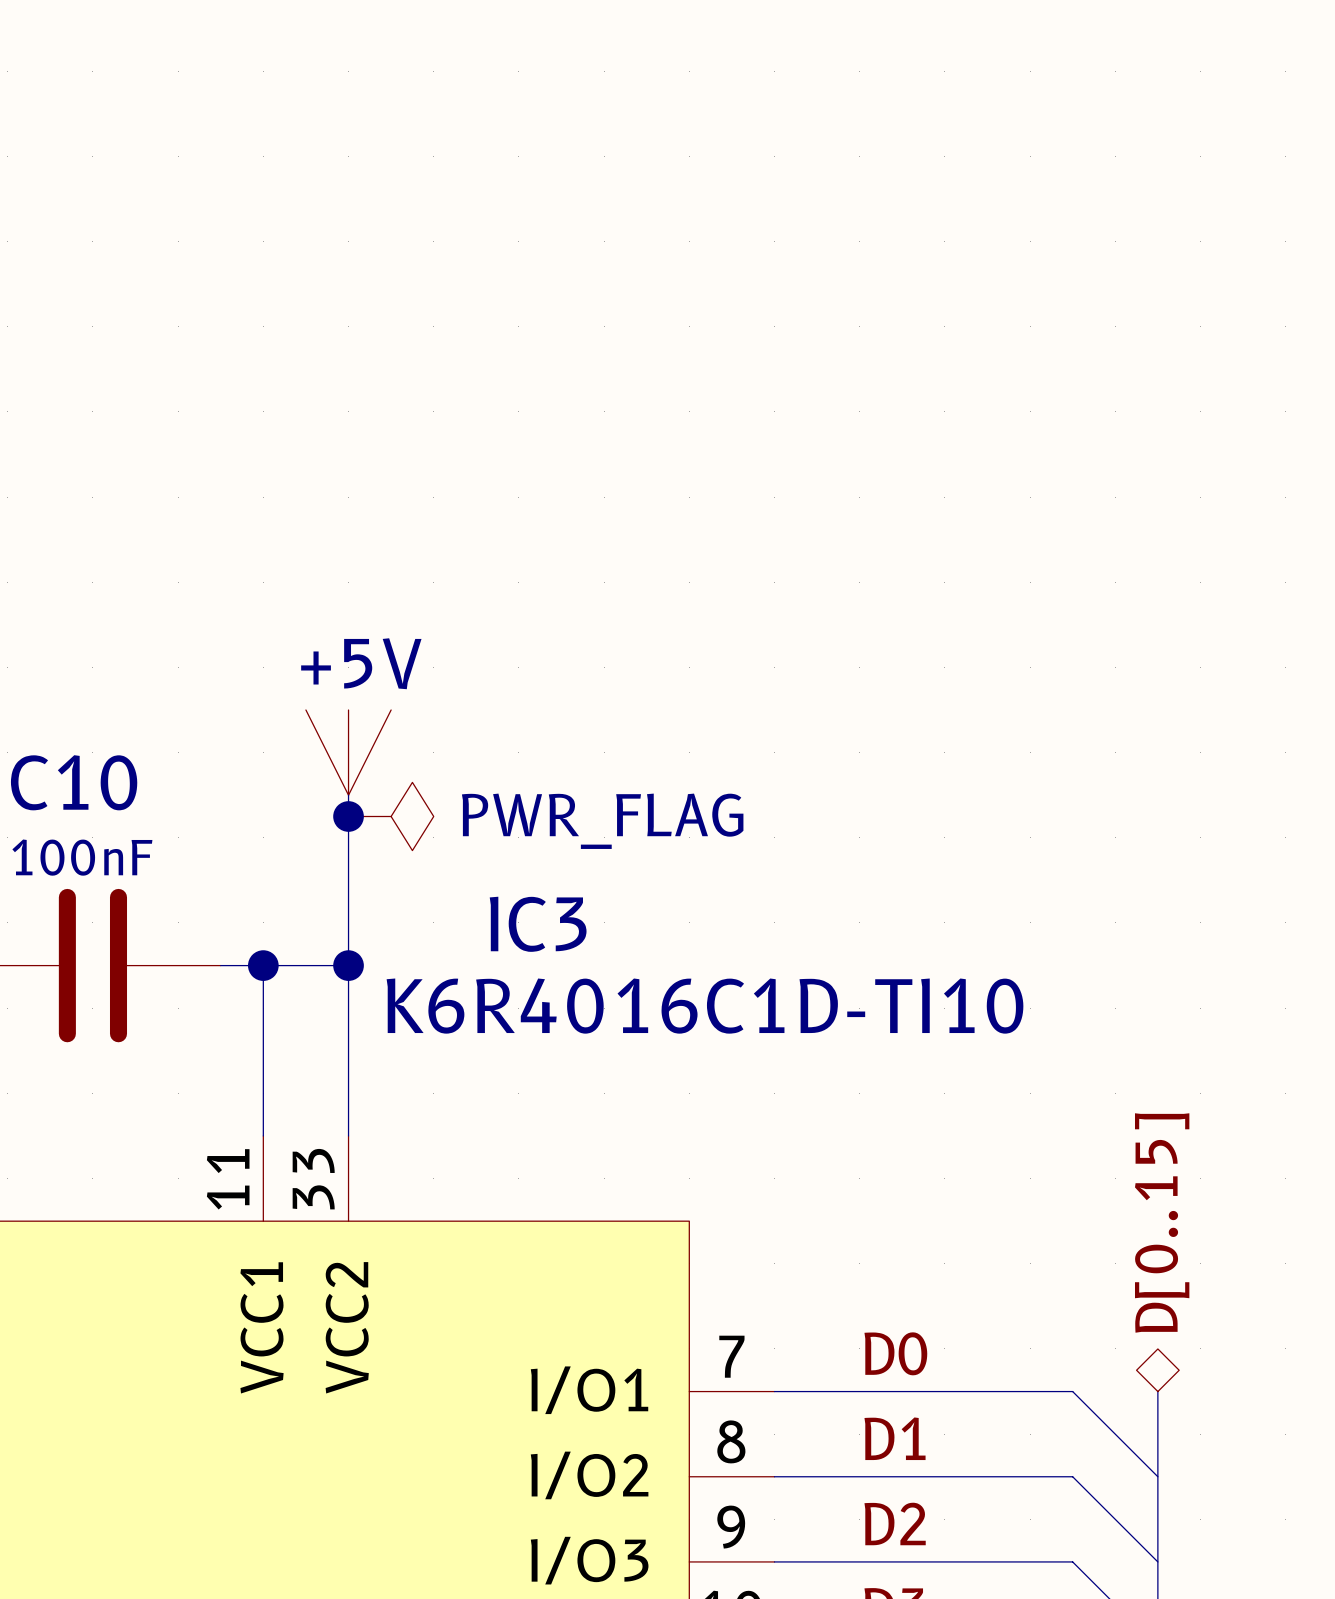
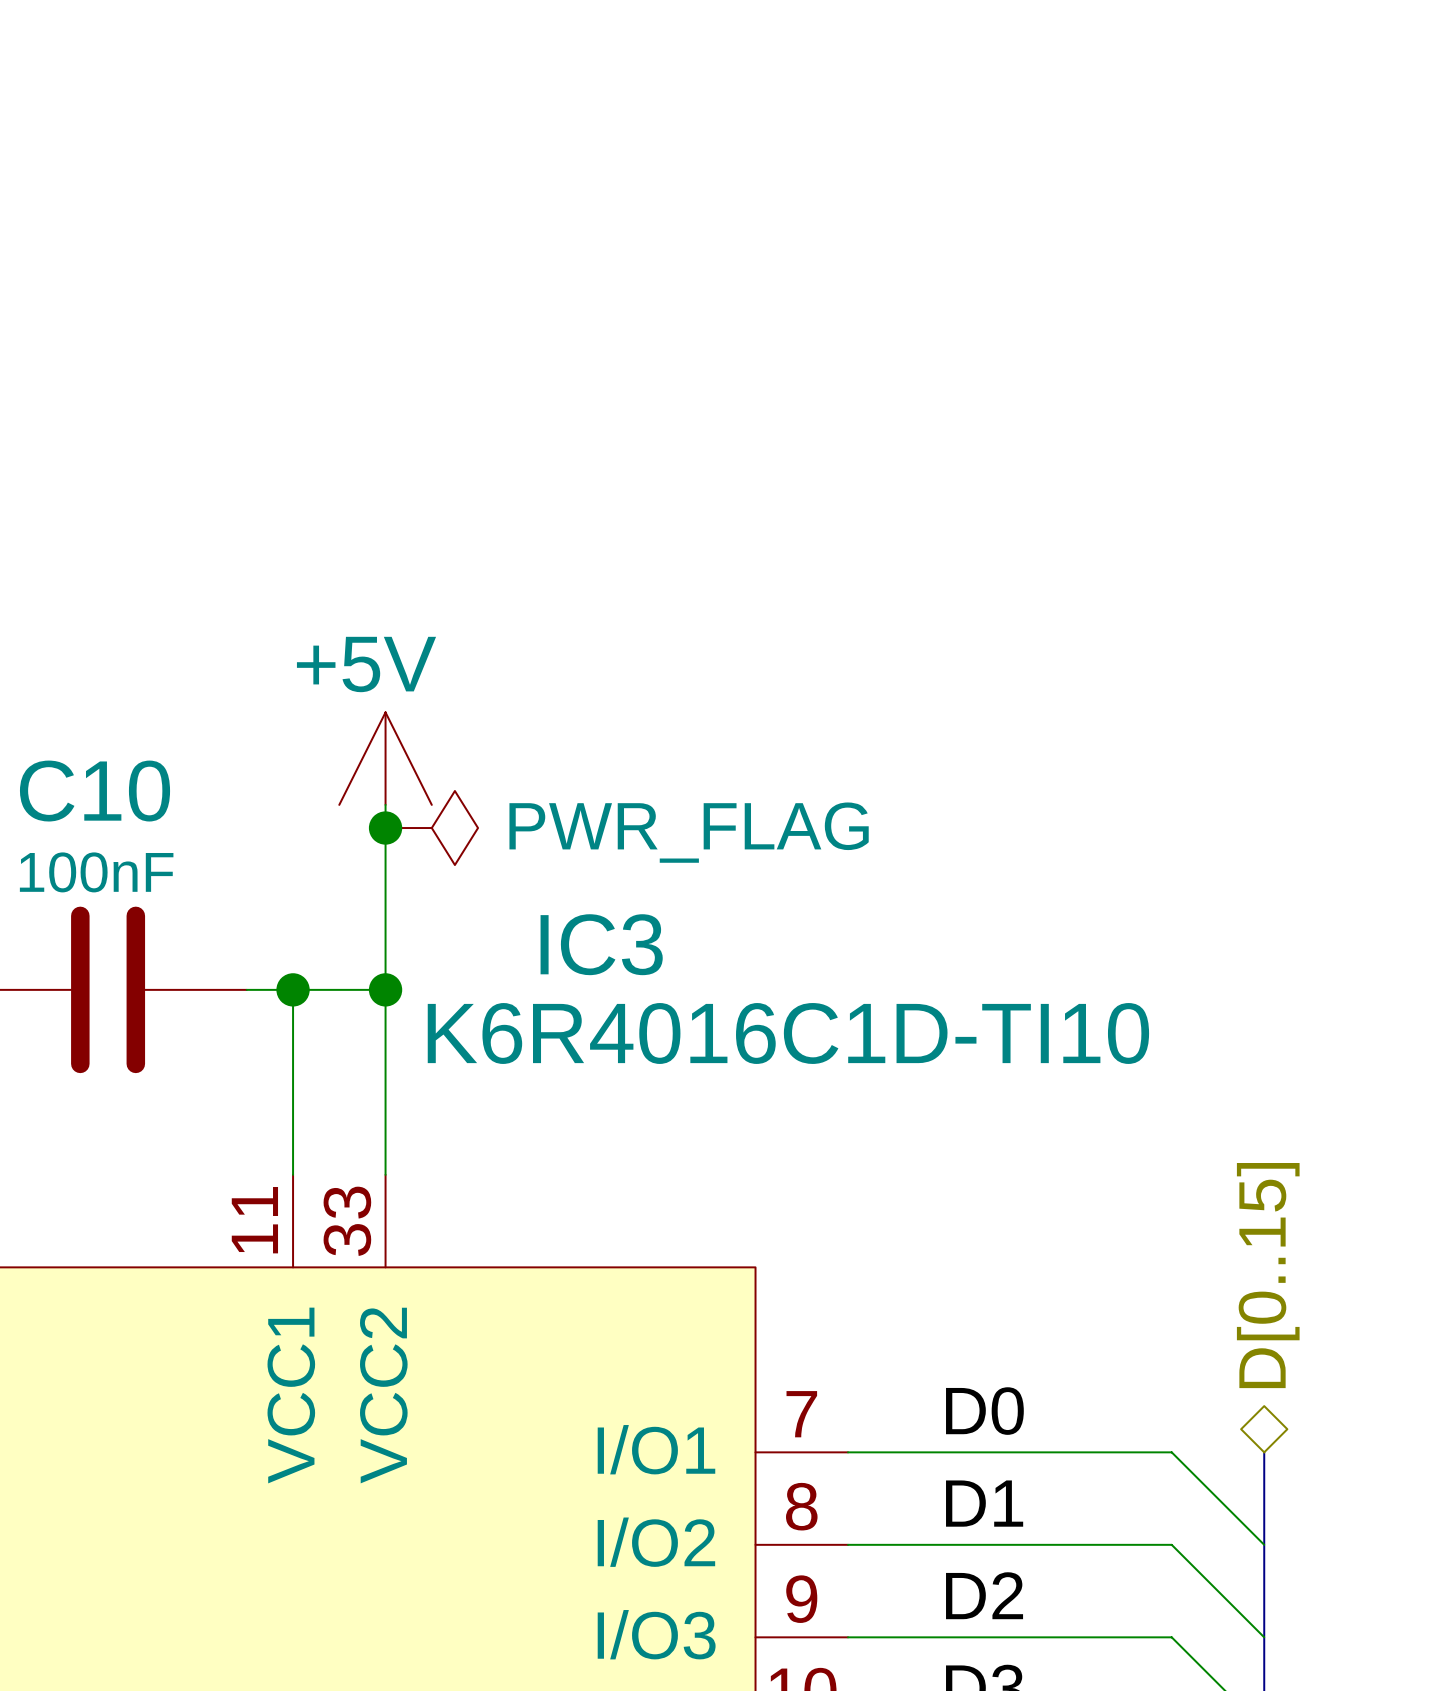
power symbol rotation: 0° (348, 752) -> 180° (385, 758)

